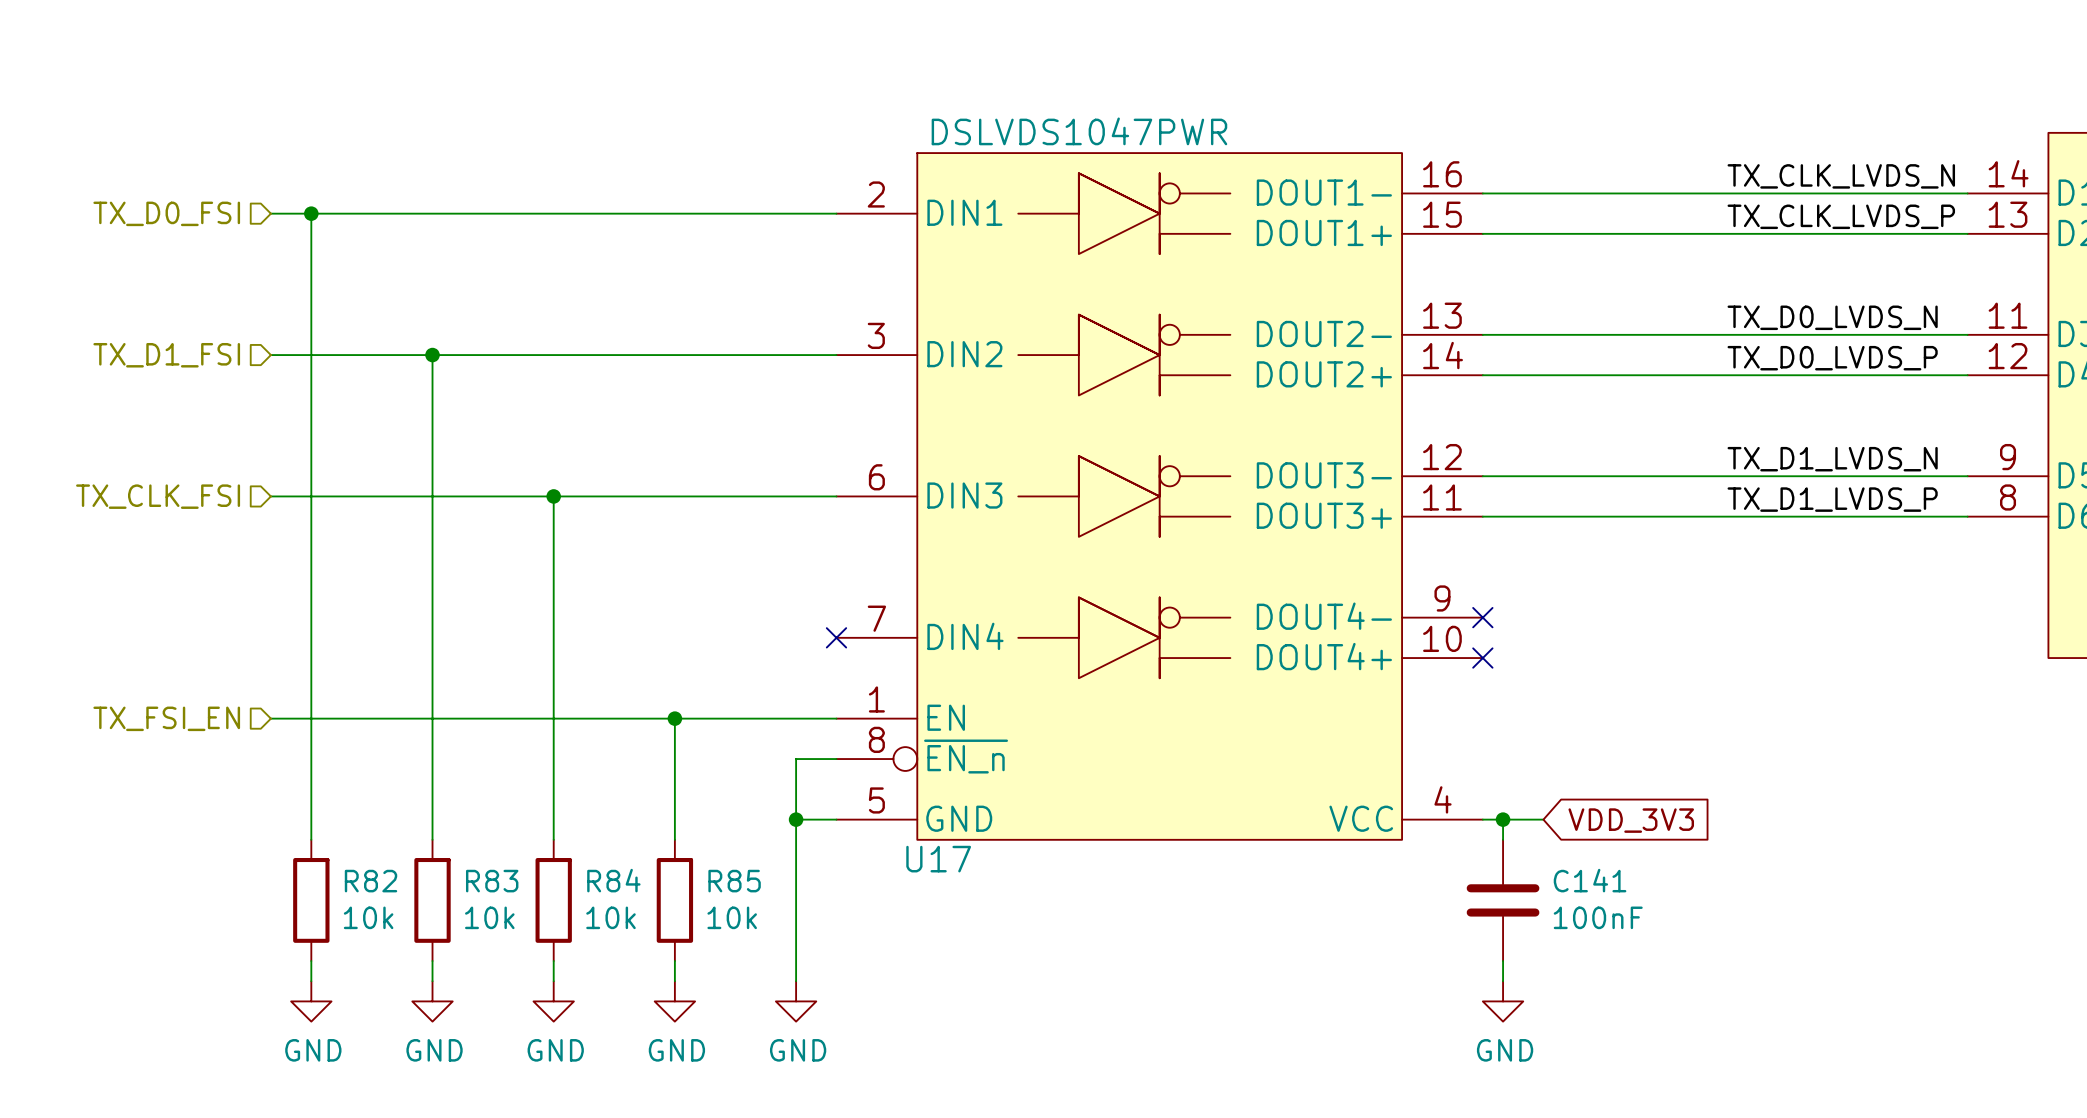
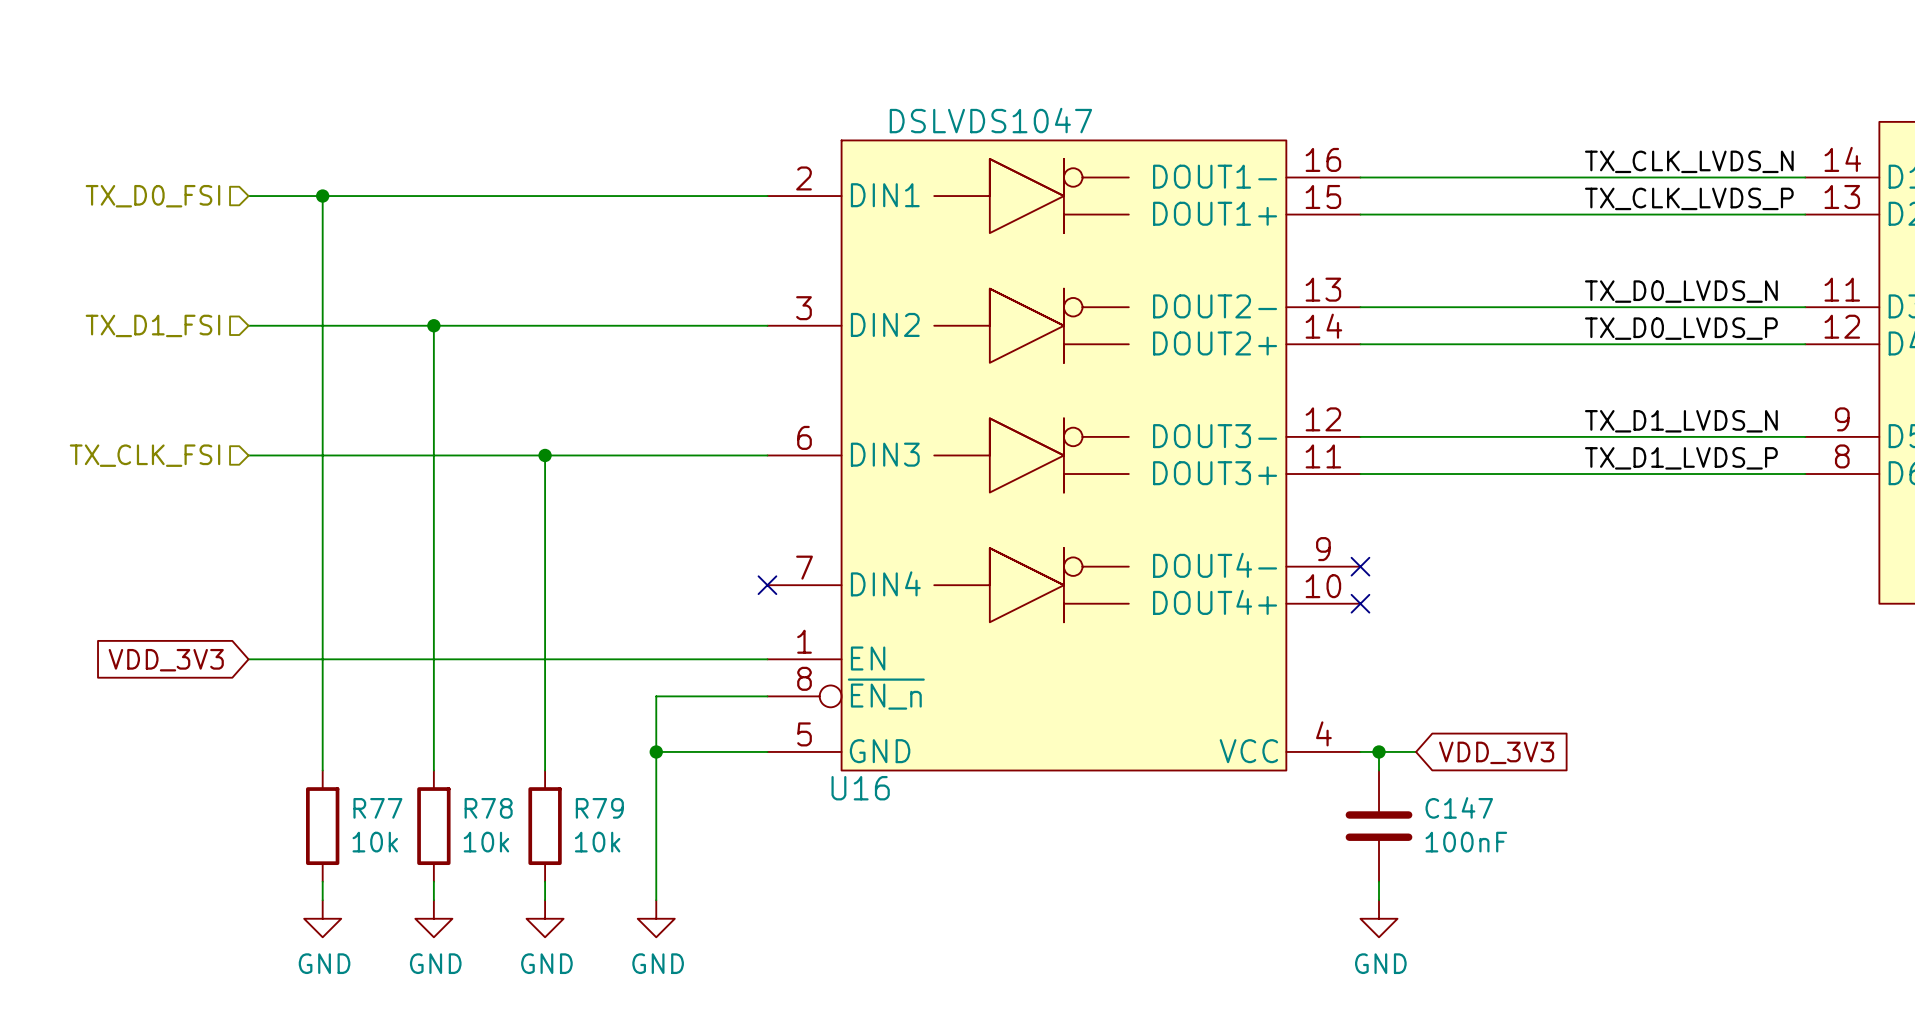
U17 value: DSLVDS1047PWR (1079, 131) -> DSLVDS1047 (990, 120)
wire: (311, 213) (311, 839) -> (322, 196) (322, 770)
junction position: (311, 213) -> (322, 196)
wire: (432, 355) (432, 839) -> (433, 325) (433, 770)
junction position: (432, 355) -> (433, 325)
wire: (553, 496) (553, 839) -> (545, 455) (545, 770)
junction position: (553, 496) -> (545, 455)
hierarchical label: TX_FSI_EN (166, 718) -> none
wire: (674, 718) (674, 839) -> none
junction: (674, 718) -> none
global label: none -> VDD_3V3 (166, 660)
wire: (796, 759) (796, 981) -> (730, 696) (656, 696) (656, 900)
wire: none -> (656, 751) (730, 751)
junction: none -> (656, 751)
junction: (796, 819) -> none
U17 name: U17 (938, 859) -> U16 (860, 788)
C141 name: C141 (1590, 880) -> C147 (1459, 807)
R82: 10k (311, 900) -> none
R77: none -> 10k (322, 826)
R83: 10k (432, 900) -> none
R78: none -> 10k (433, 826)
R84: 10k (553, 900) -> none
R79: none -> 10k (545, 826)
R85: 10k (674, 900) -> none
wire: (311, 961) (311, 981) -> (322, 881) (322, 900)
wire: (432, 961) (432, 981) -> (433, 881) (433, 900)
wire: (553, 961) (553, 981) -> (545, 881) (545, 900)
wire: (674, 961) (674, 981) -> none
power symbol: GND (311, 1001) -> none
power symbol: none -> GND (322, 918)
power symbol: GND (432, 1001) -> none
power symbol: none -> GND (433, 918)
power symbol: GND (553, 1001) -> none
power symbol: none -> GND (545, 918)
power symbol: GND (674, 1001) -> none
power symbol: none -> GND (656, 918)
power symbol: GND (796, 1001) -> none

